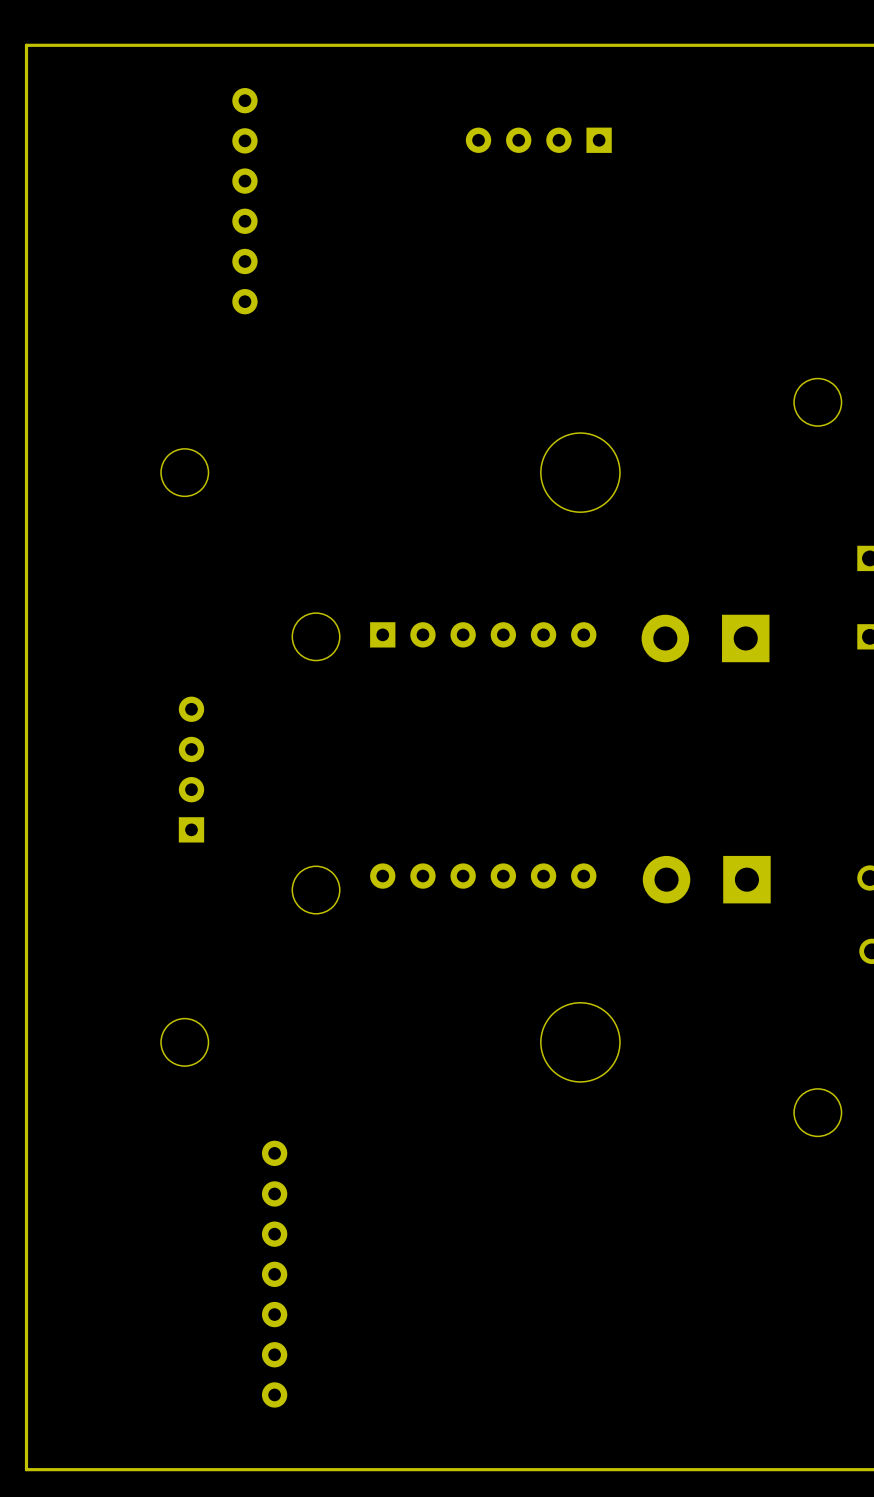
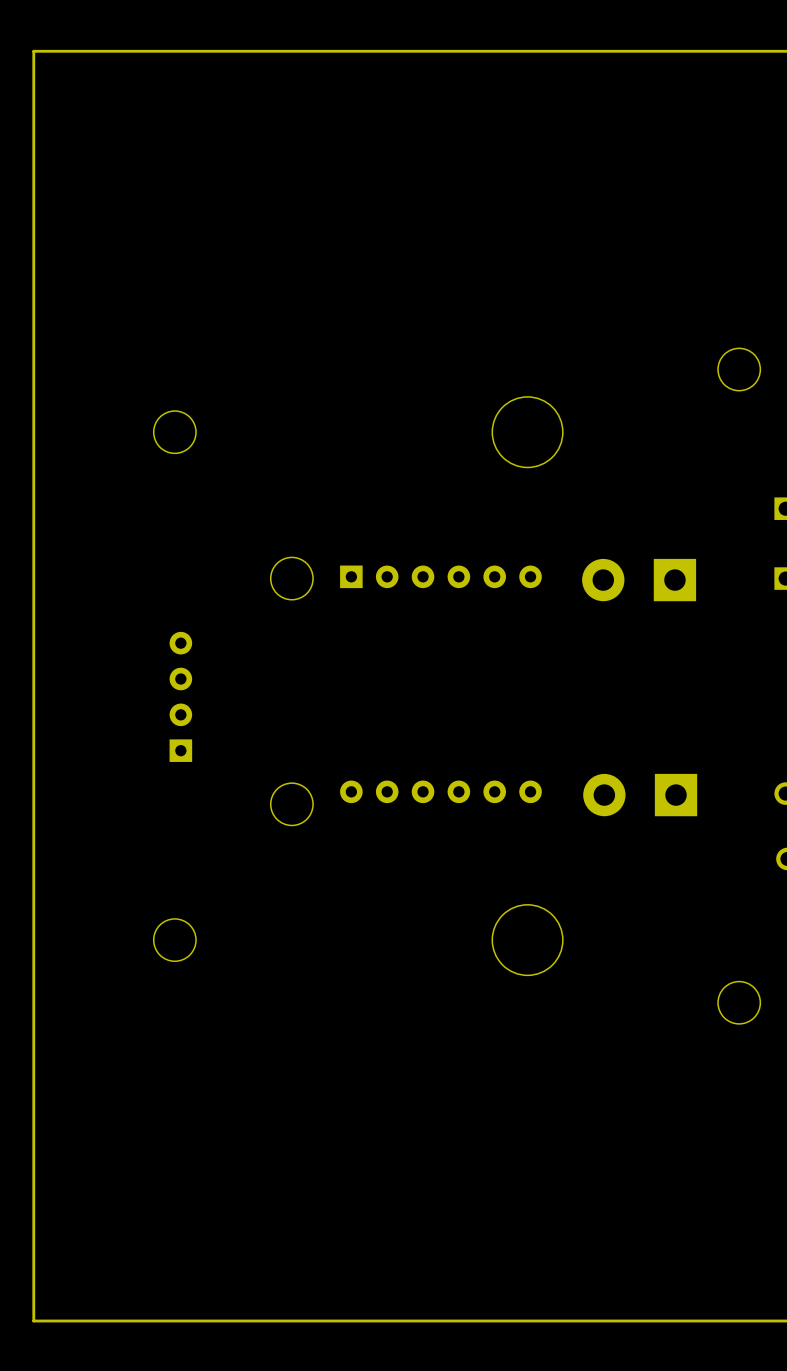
part: (538, 140) -> none
part: (244, 201) -> none
part: (274, 1274) -> none

